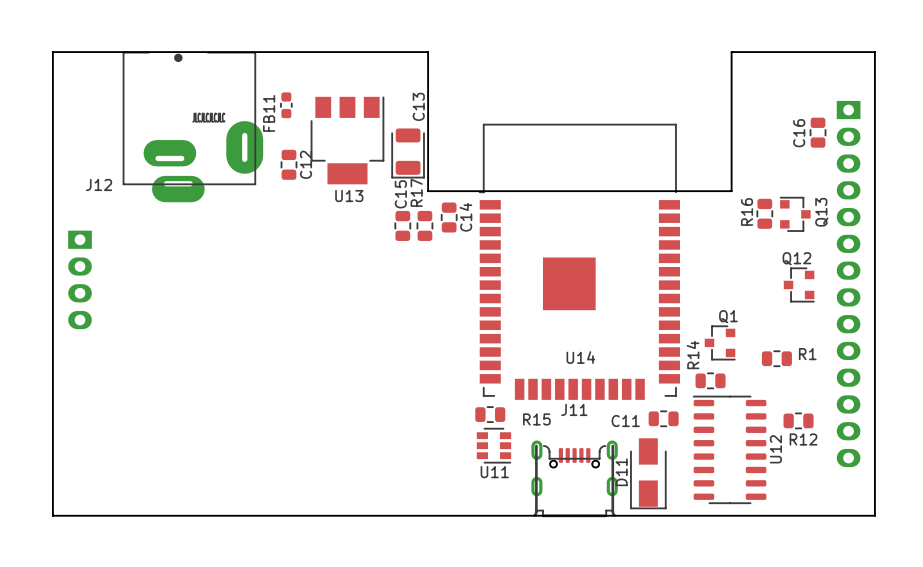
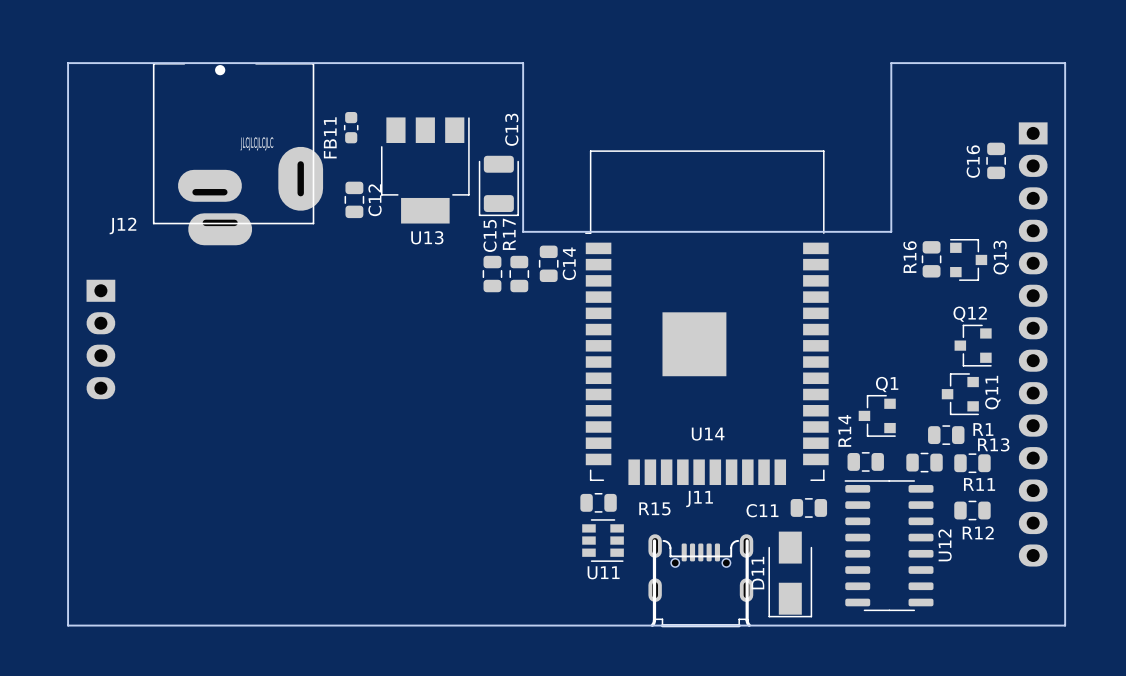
Q11: none -> (960, 394)
R13: none -> (924, 462)
R11: none -> (972, 463)

